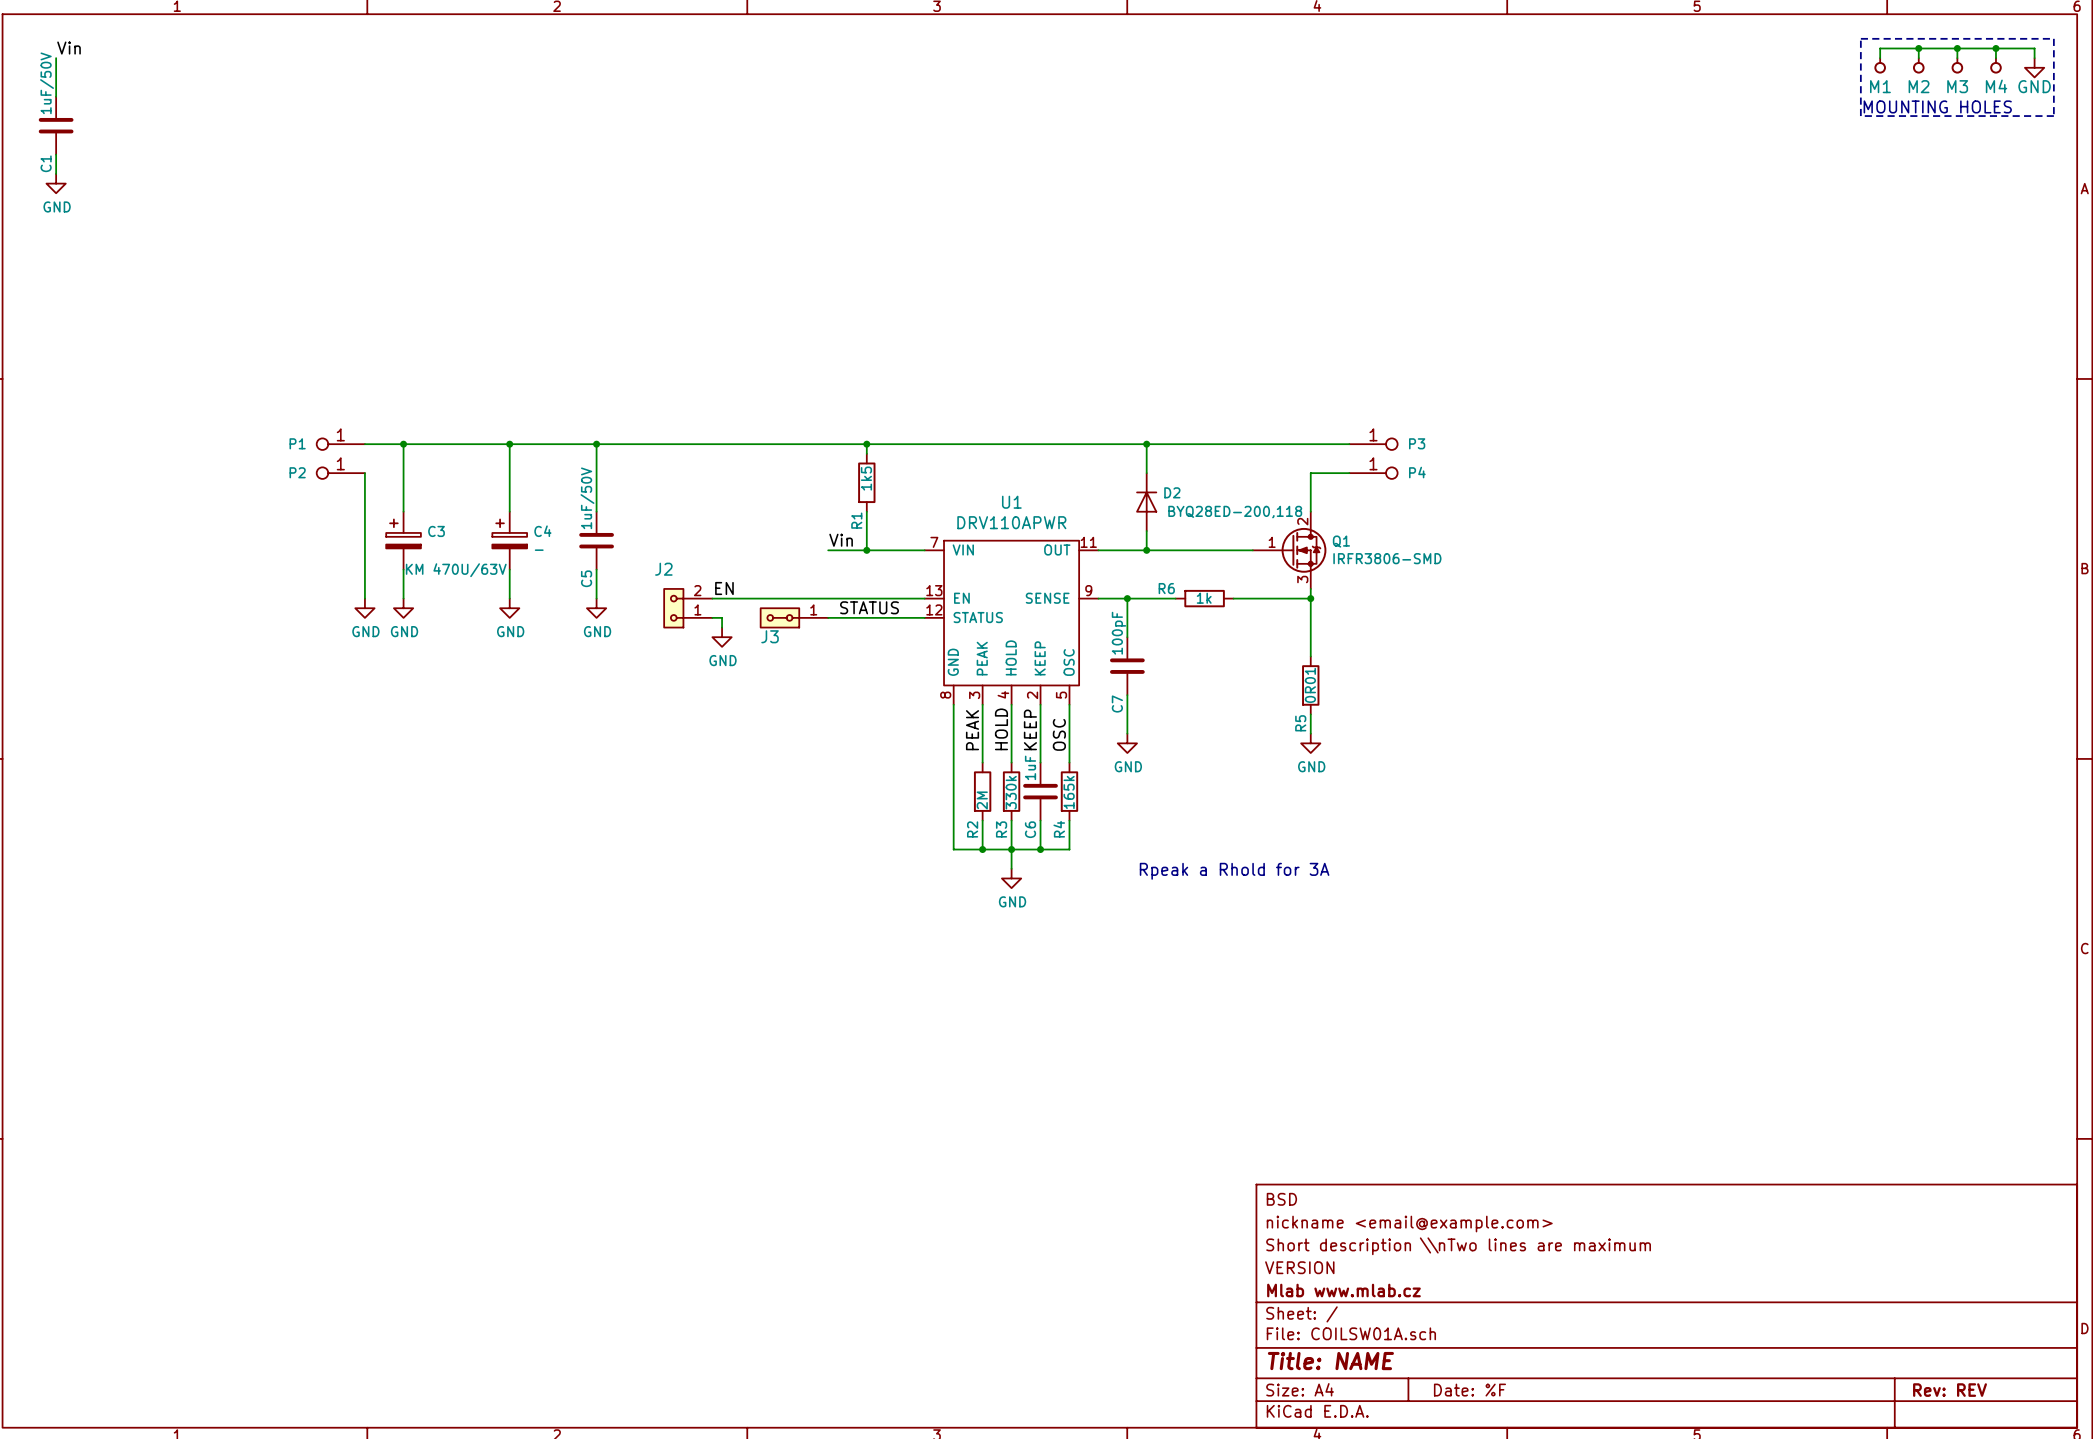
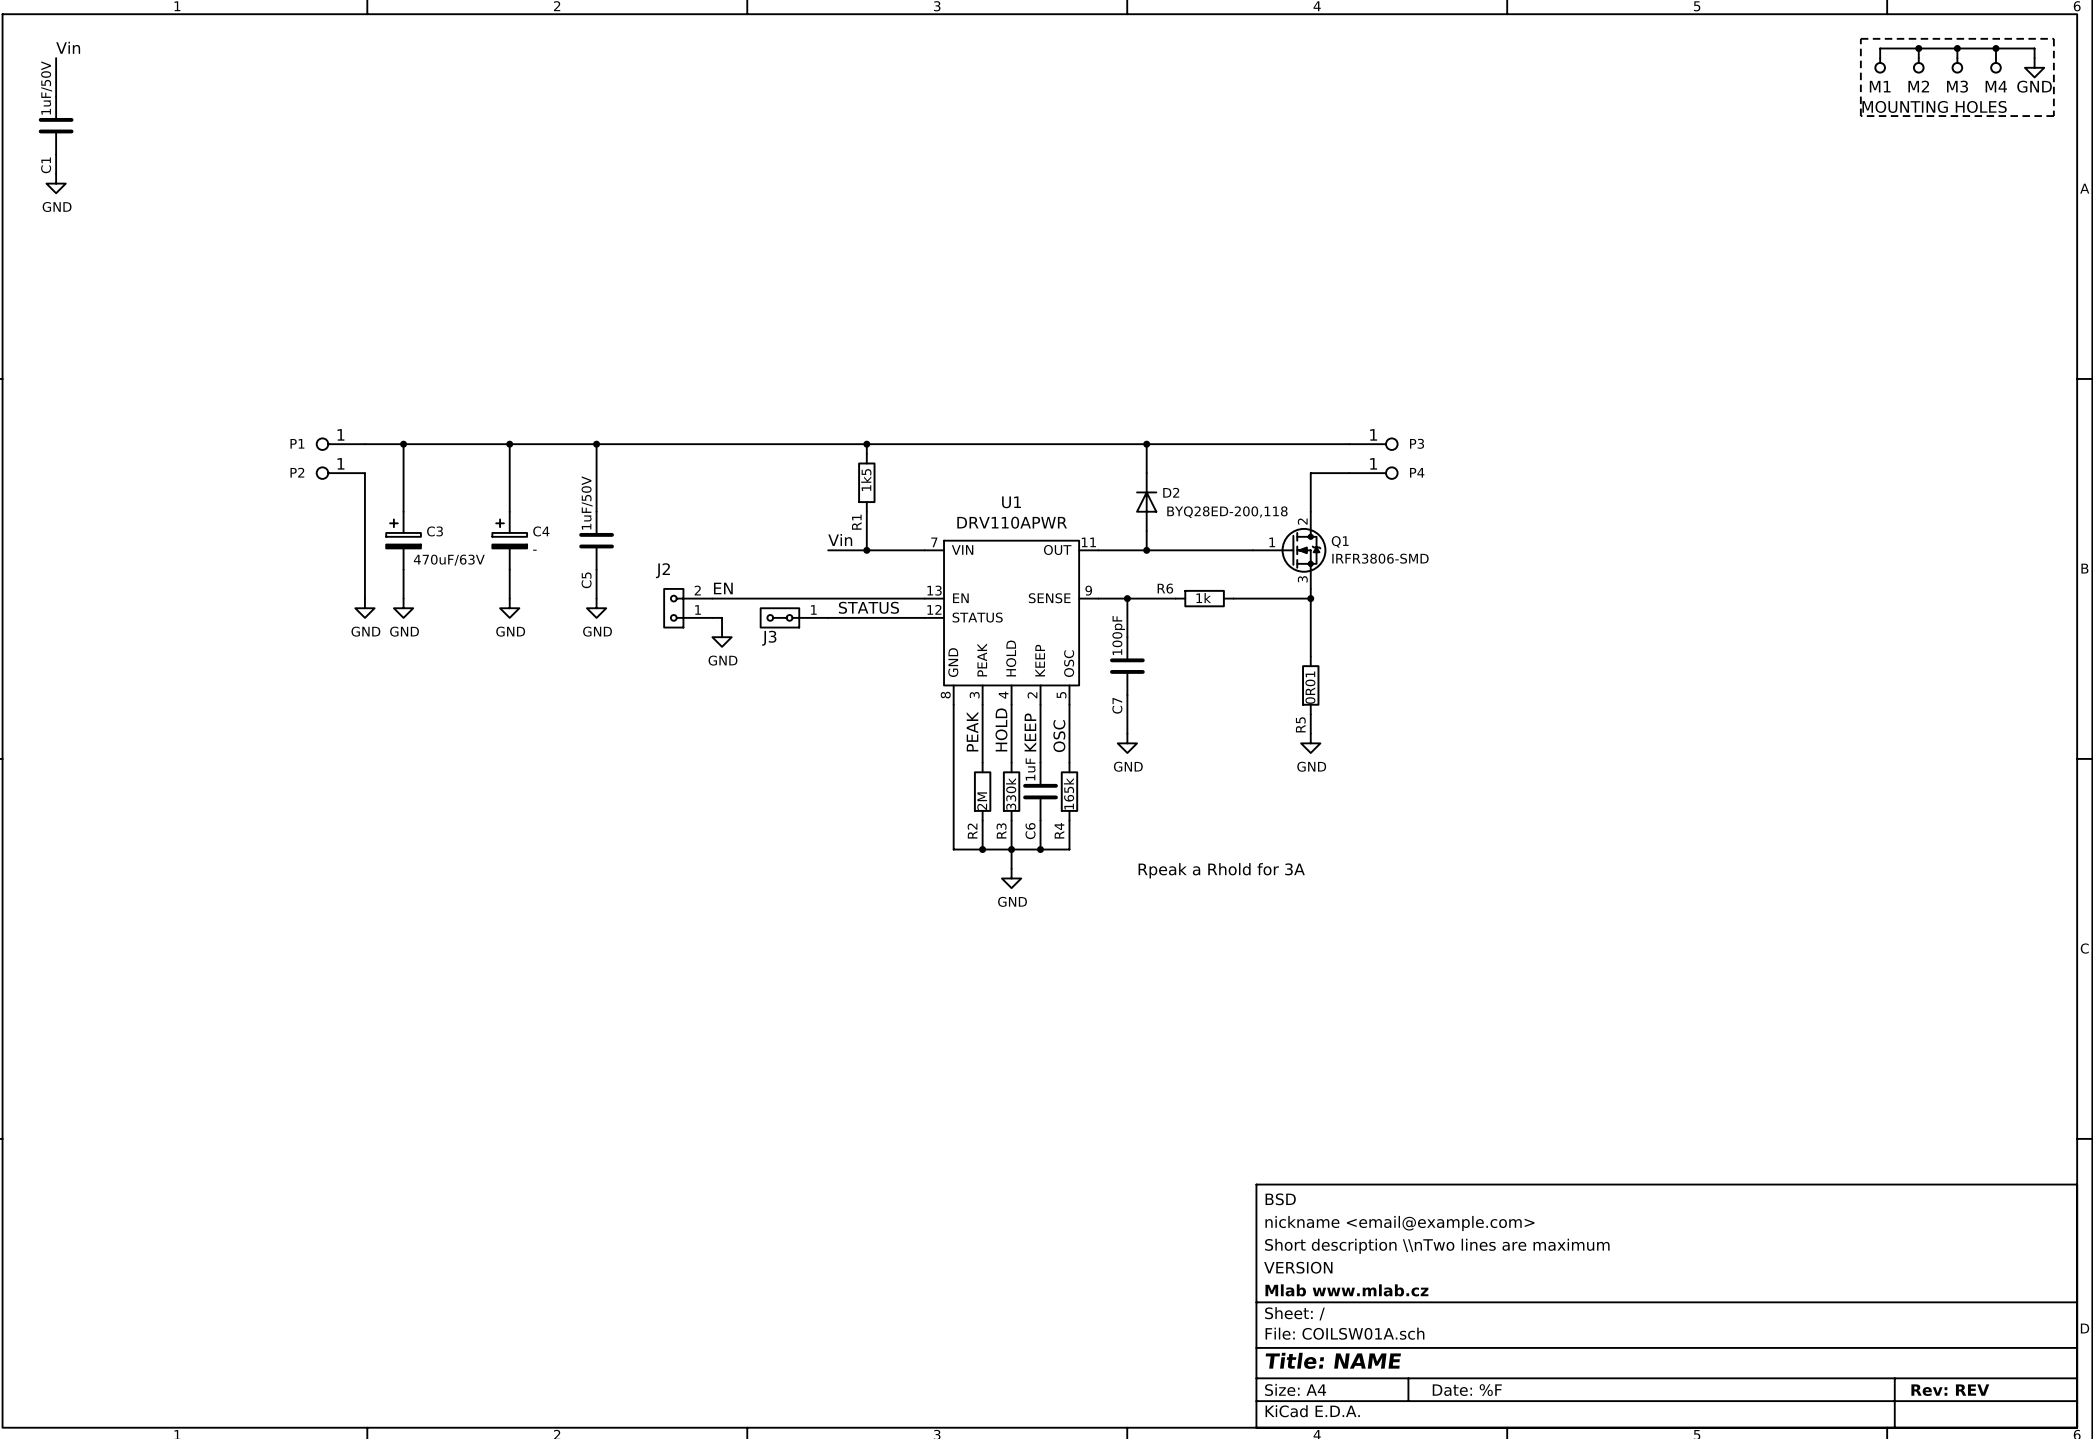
C3 value: KM 470U/63V (456, 570) -> 470uF/63V (449, 560)

